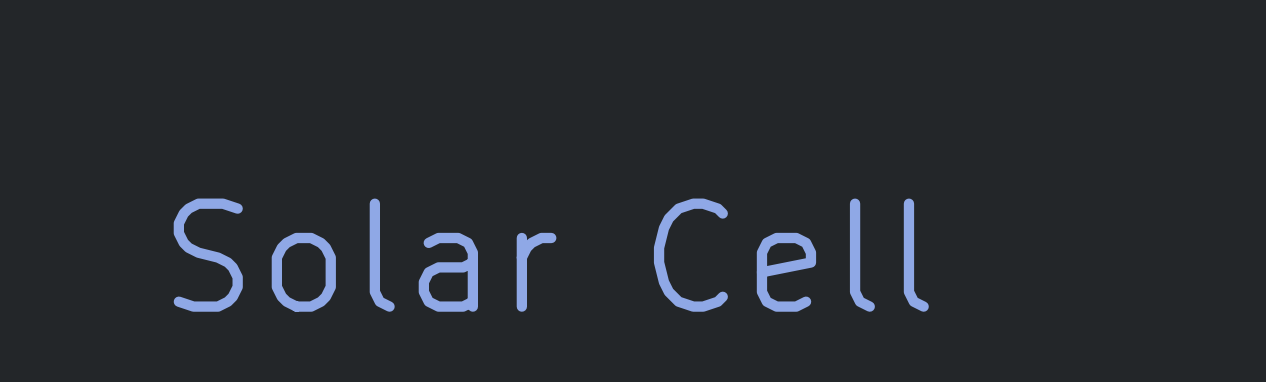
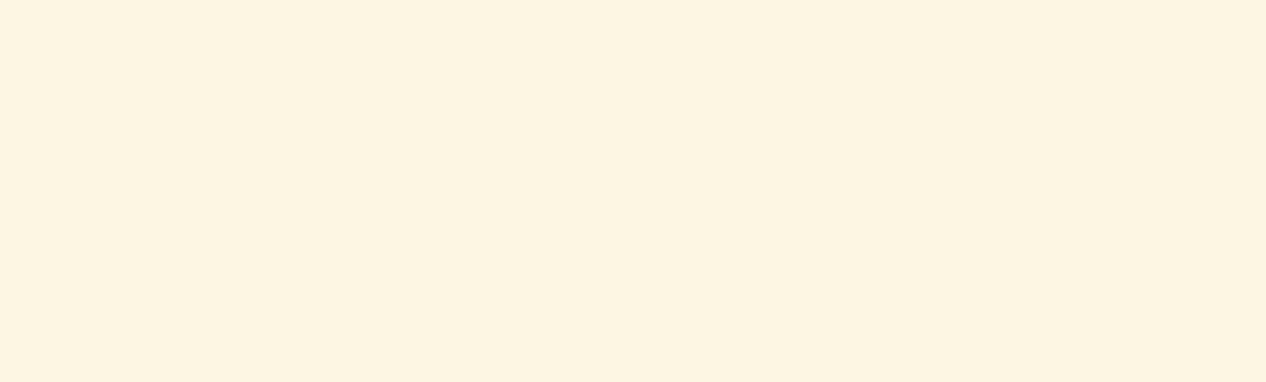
text: Solar Cell (551, 255) -> none

